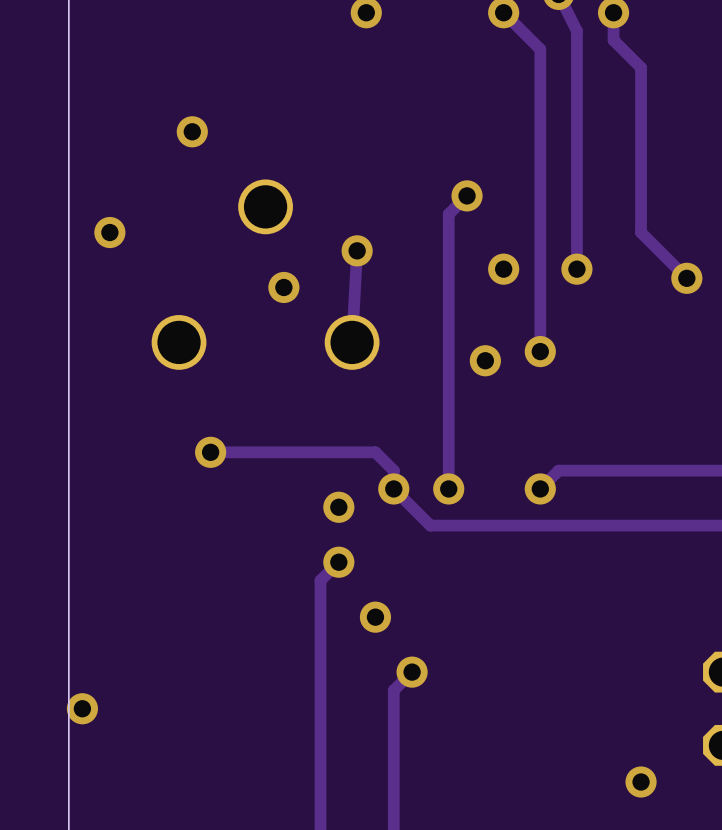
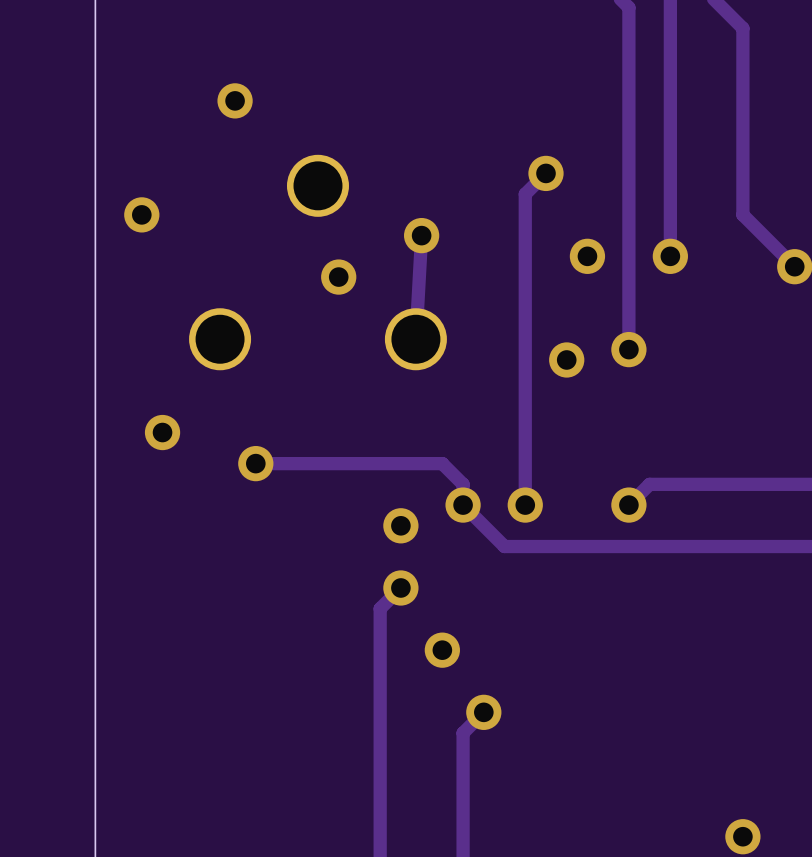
via: none -> (162, 432)
via: (82, 708) -> none

